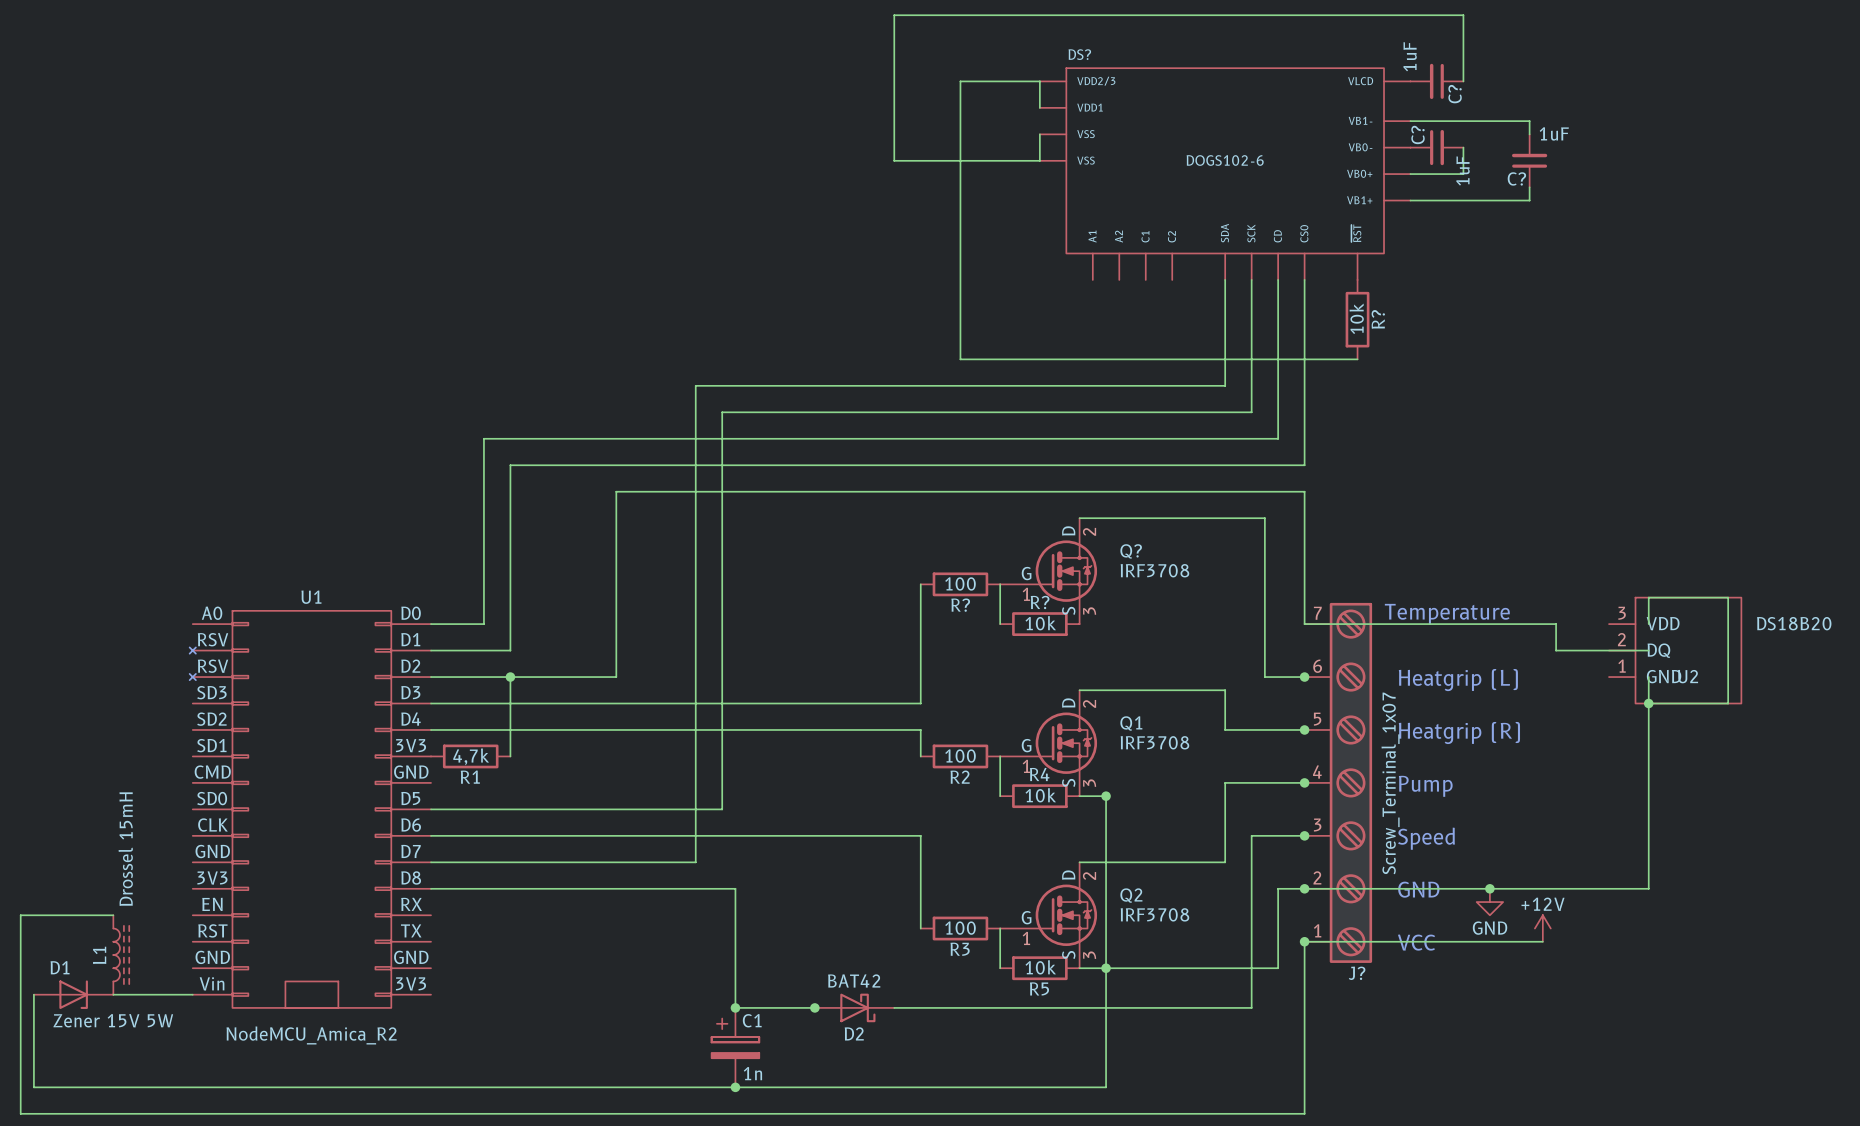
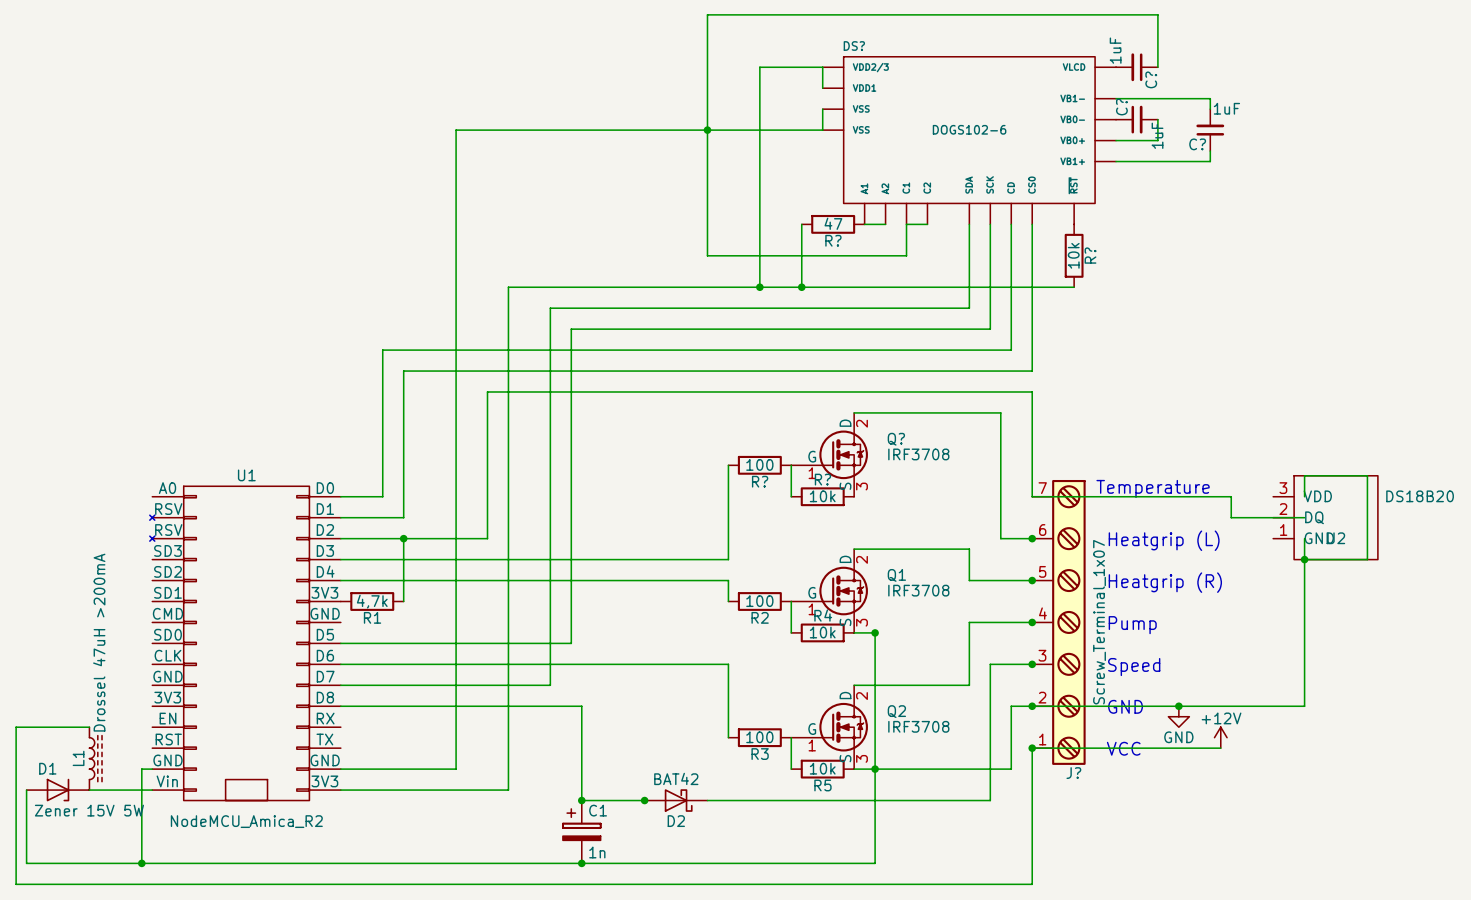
junction: none -> (707, 130)
wire: none -> (801, 224) (801, 287)
R?: none -> 47 (833, 224)
wire: none -> (864, 224) (885, 224)
wire: none -> (927, 224) (906, 224) (906, 255) (707, 255) (707, 130) (456, 130) (456, 769) (340, 769)
wire: none -> (759, 287) (508, 287) (508, 790) (340, 790)
junction: none -> (759, 287)
junction: none -> (801, 287)
L1 value: Drossel 15mH (125, 849) -> Drossel 47uH >200mA (99, 642)
wire: none -> (152, 769) (141, 769) (141, 863)
junction: none -> (141, 863)

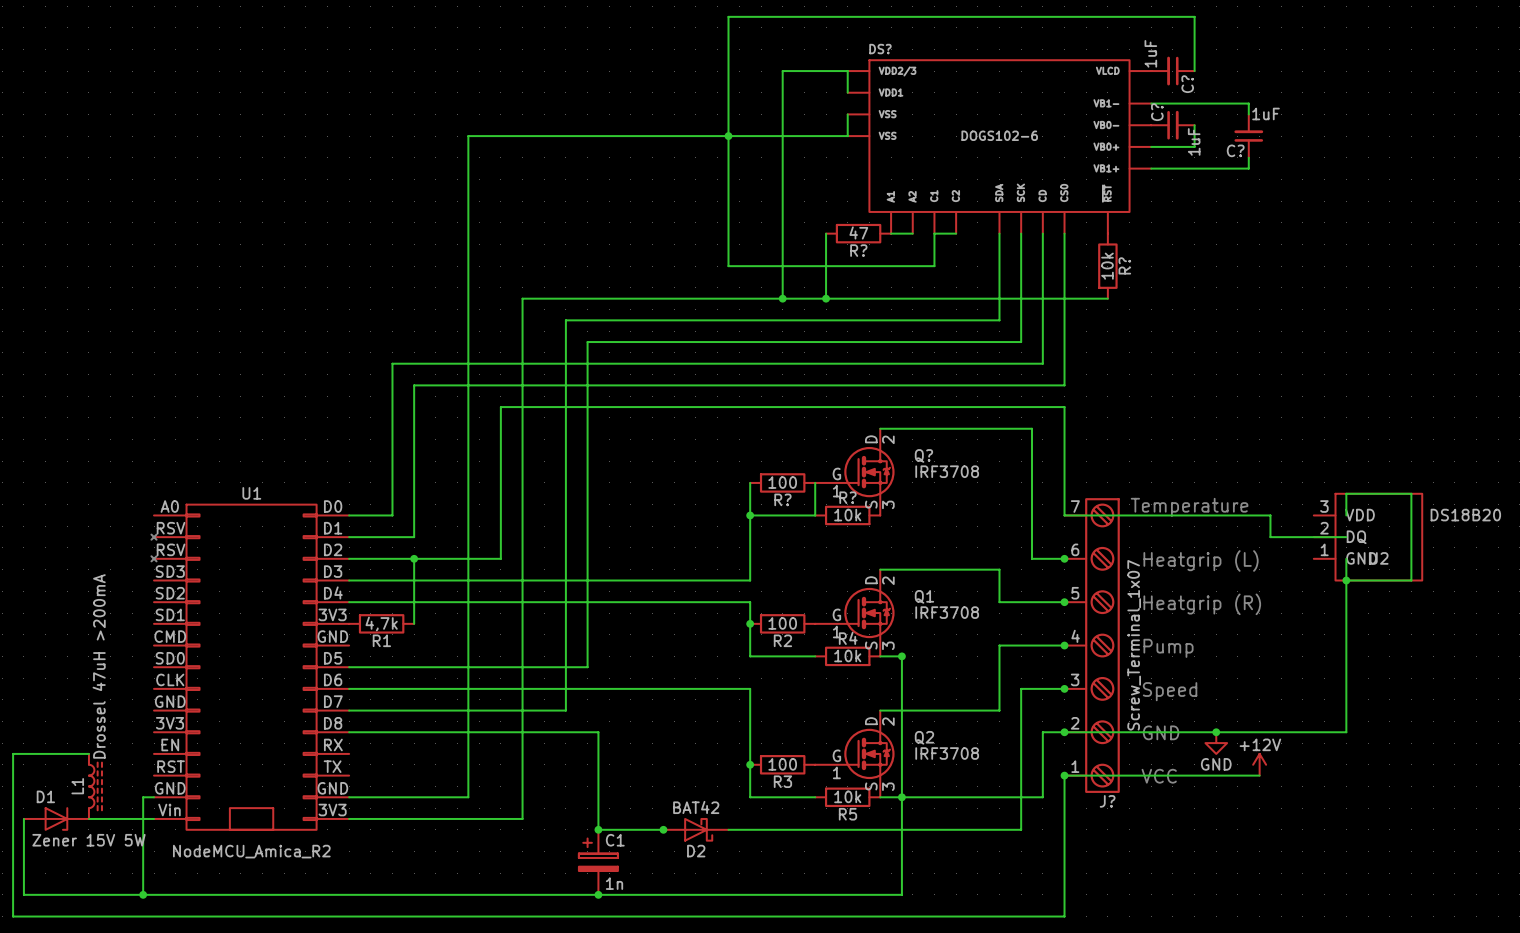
wire: none -> (750, 515) (815, 515)
junction: none -> (750, 515)
junction: none -> (750, 623)
wire: (791, 601) (791, 632) -> (750, 623) (750, 656) (815, 656)
junction: none -> (750, 764)
wire: (791, 737) (791, 769) -> (750, 764) (750, 797) (815, 797)

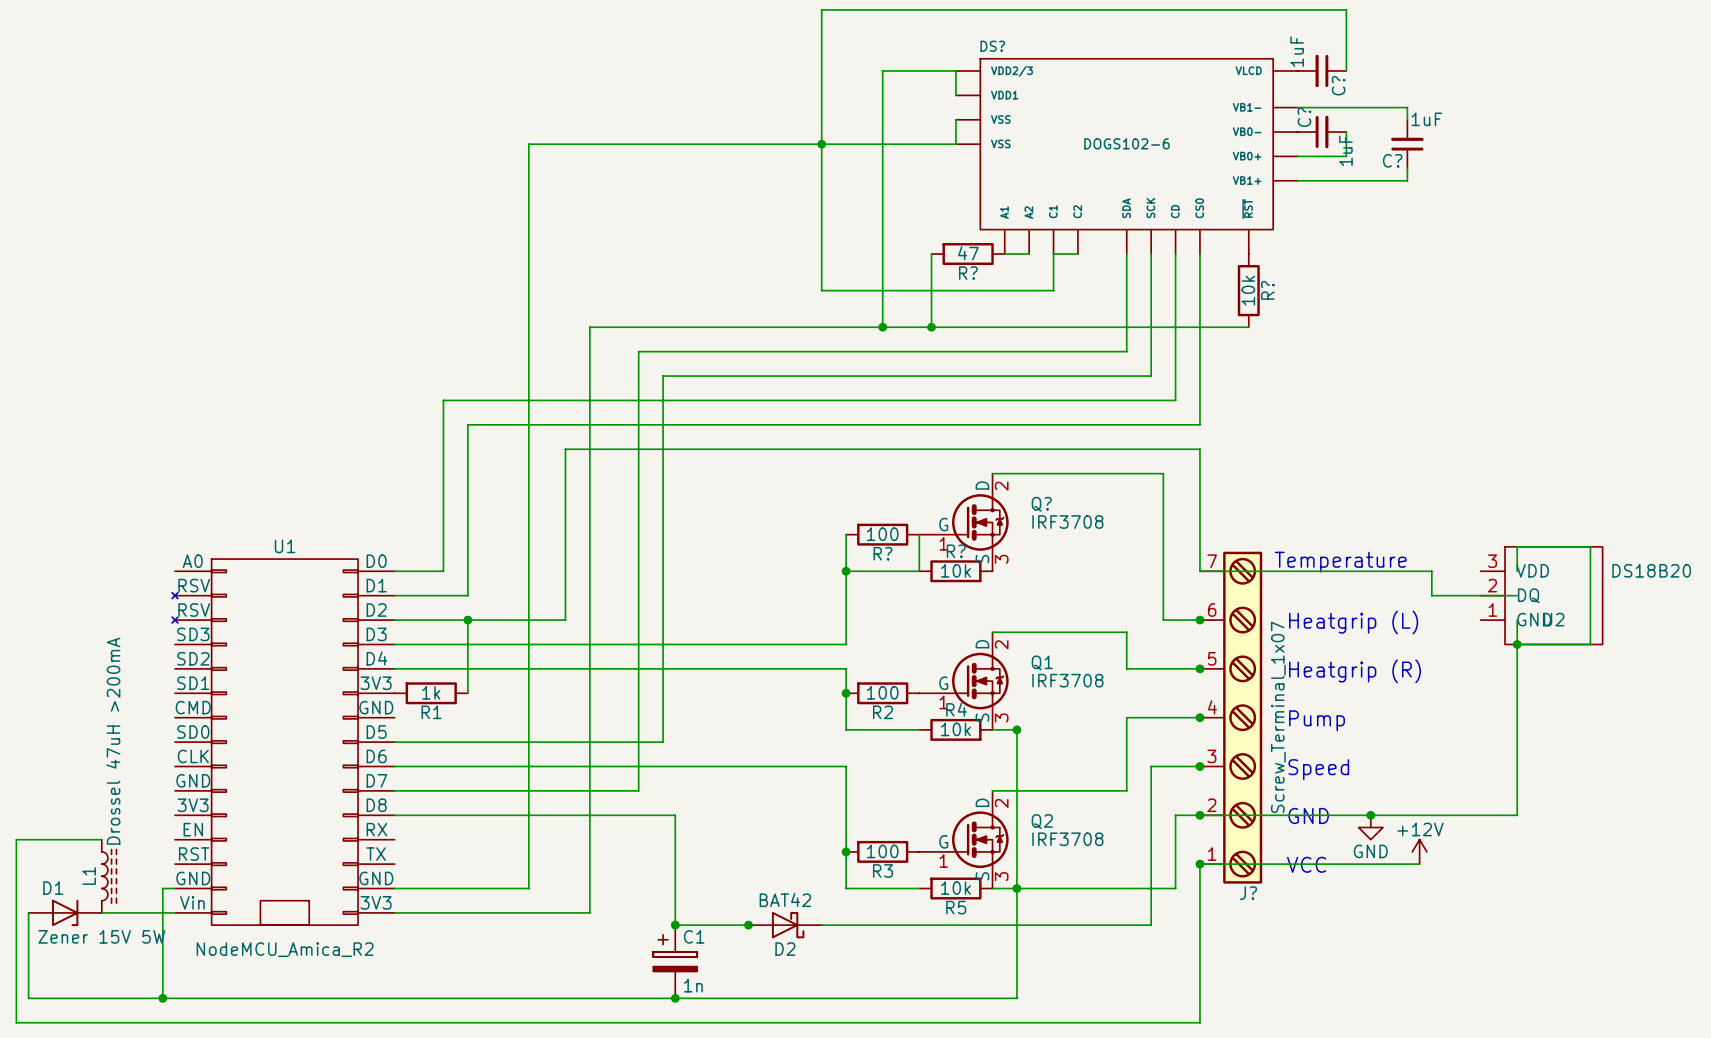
R1 value: 4,7k (381, 623) -> 1k (431, 692)

